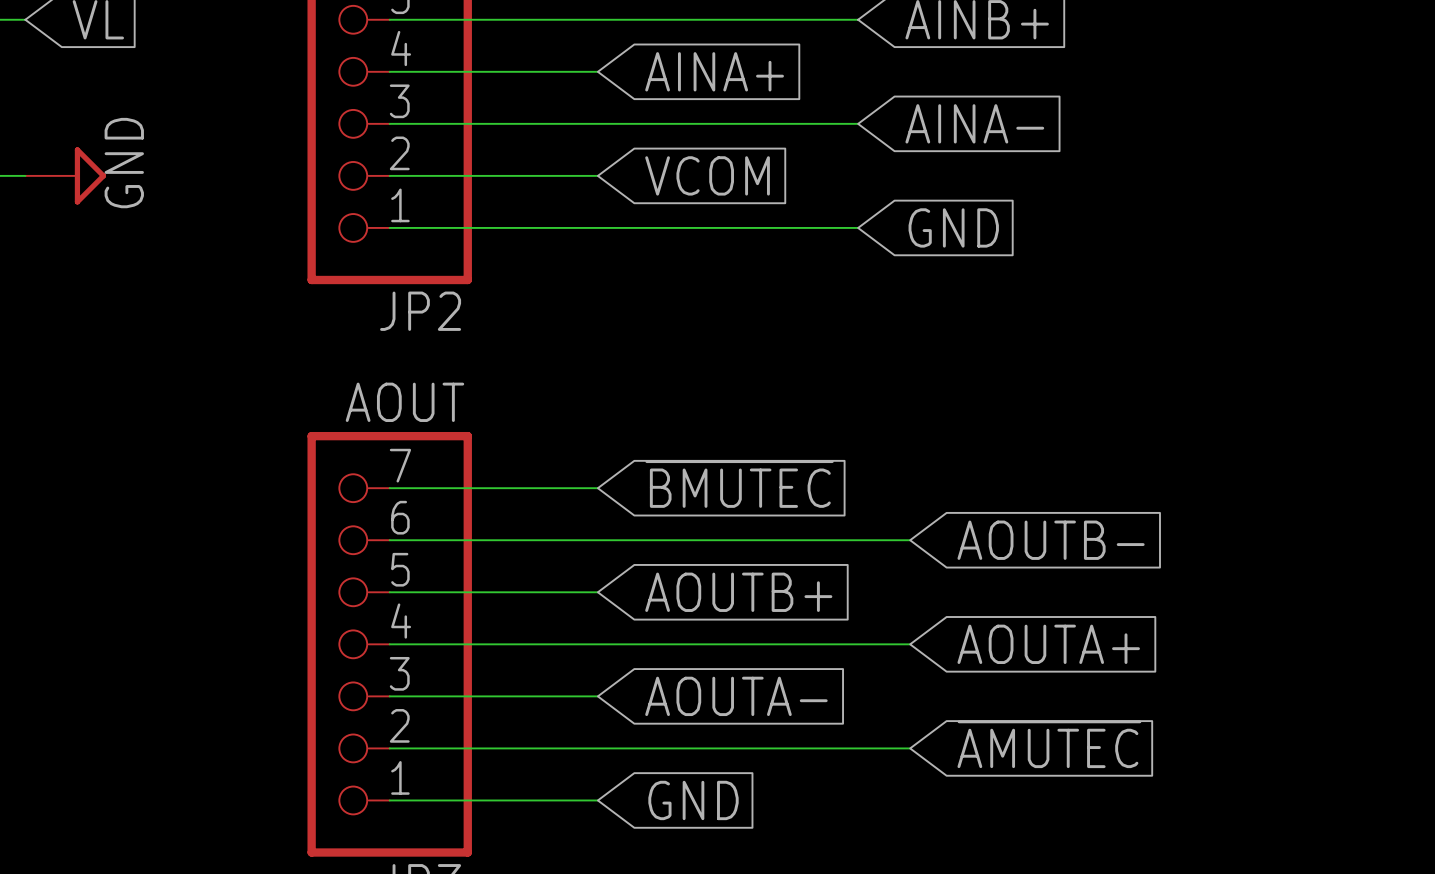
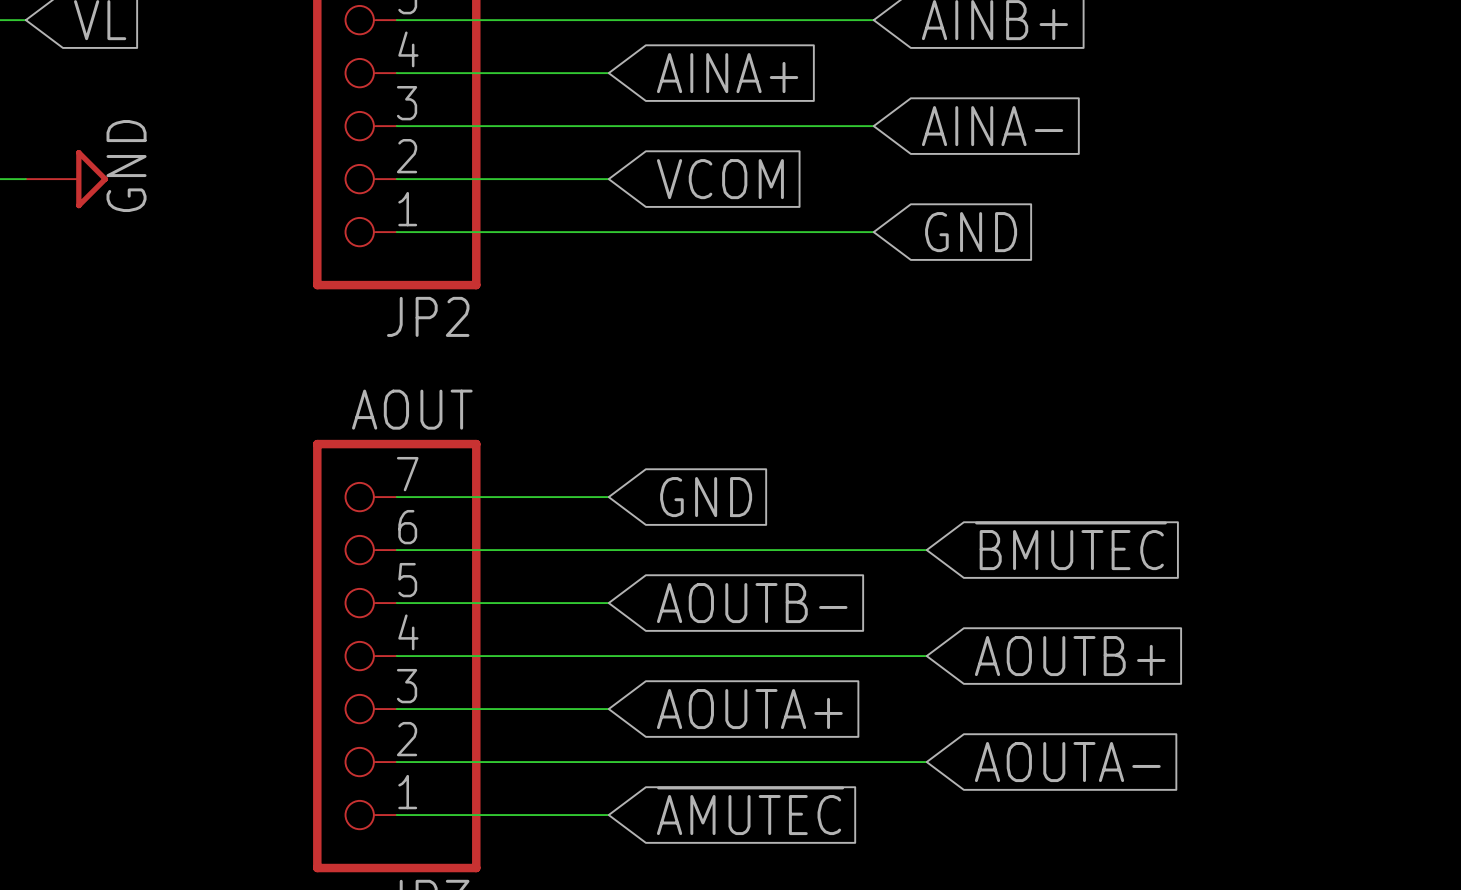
global label: ~{BMUTEC} (739, 484) -> GND (706, 497)
global label: AOUTB- (1051, 540) -> ~{BMUTEC} (1070, 545)
global label: AOUTB+ (738, 592) -> AOUTB- (752, 603)
global label: AOUTA+ (1048, 644) -> AOUTB+ (1070, 656)
global label: AOUTA- (736, 696) -> AOUTA+ (749, 709)
global label: ~{AMUTEC} (1049, 744) -> AOUTA- (1067, 762)
global label: GND (693, 800) -> ~{AMUTEC} (750, 810)

